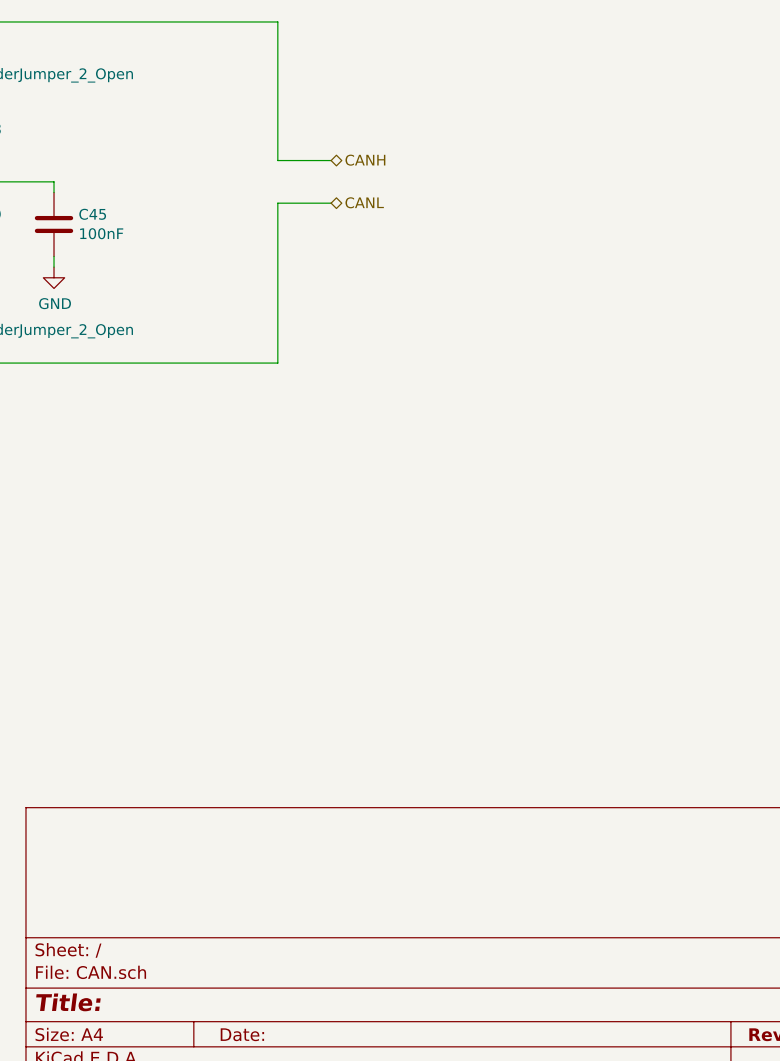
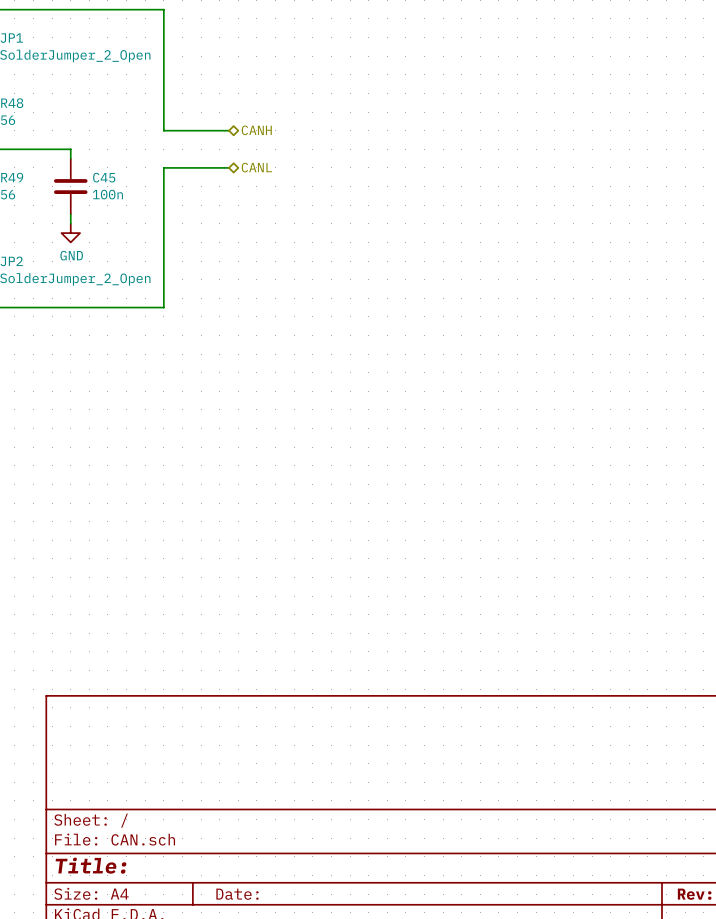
wire: (160, 21) (277, 21) (277, 160) (331, 160) -> (163, 9) (163, 130) (229, 130)
hierarchical label position: CANH (365, 160) -> CANH (256, 130)
hierarchical label position: CANL (364, 202) -> CANL (256, 167)
wire: (331, 203) (277, 203) (277, 363) (160, 363) -> (229, 167) (163, 167) (163, 307)
C45 value: 100nF (101, 233) -> 100n (107, 194)

